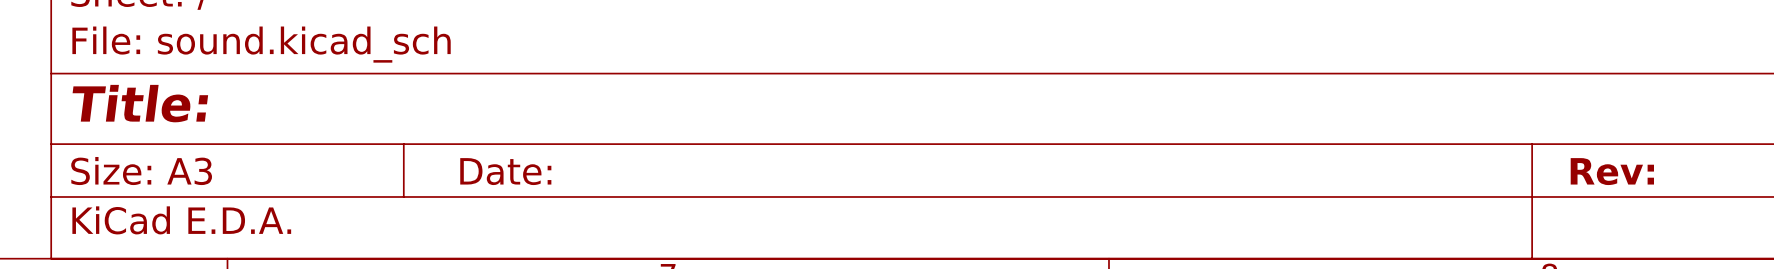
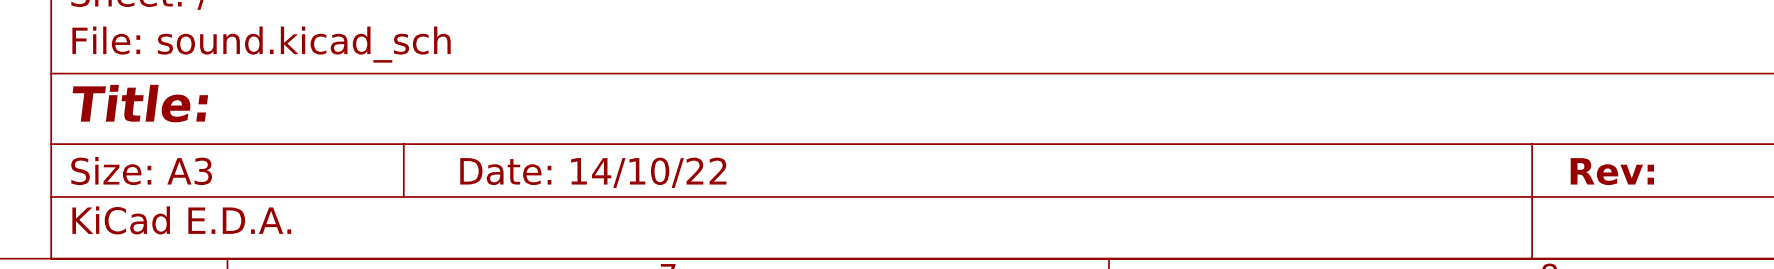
title block: Date: (505, 171) -> Date: 14/10/22 (593, 172)

